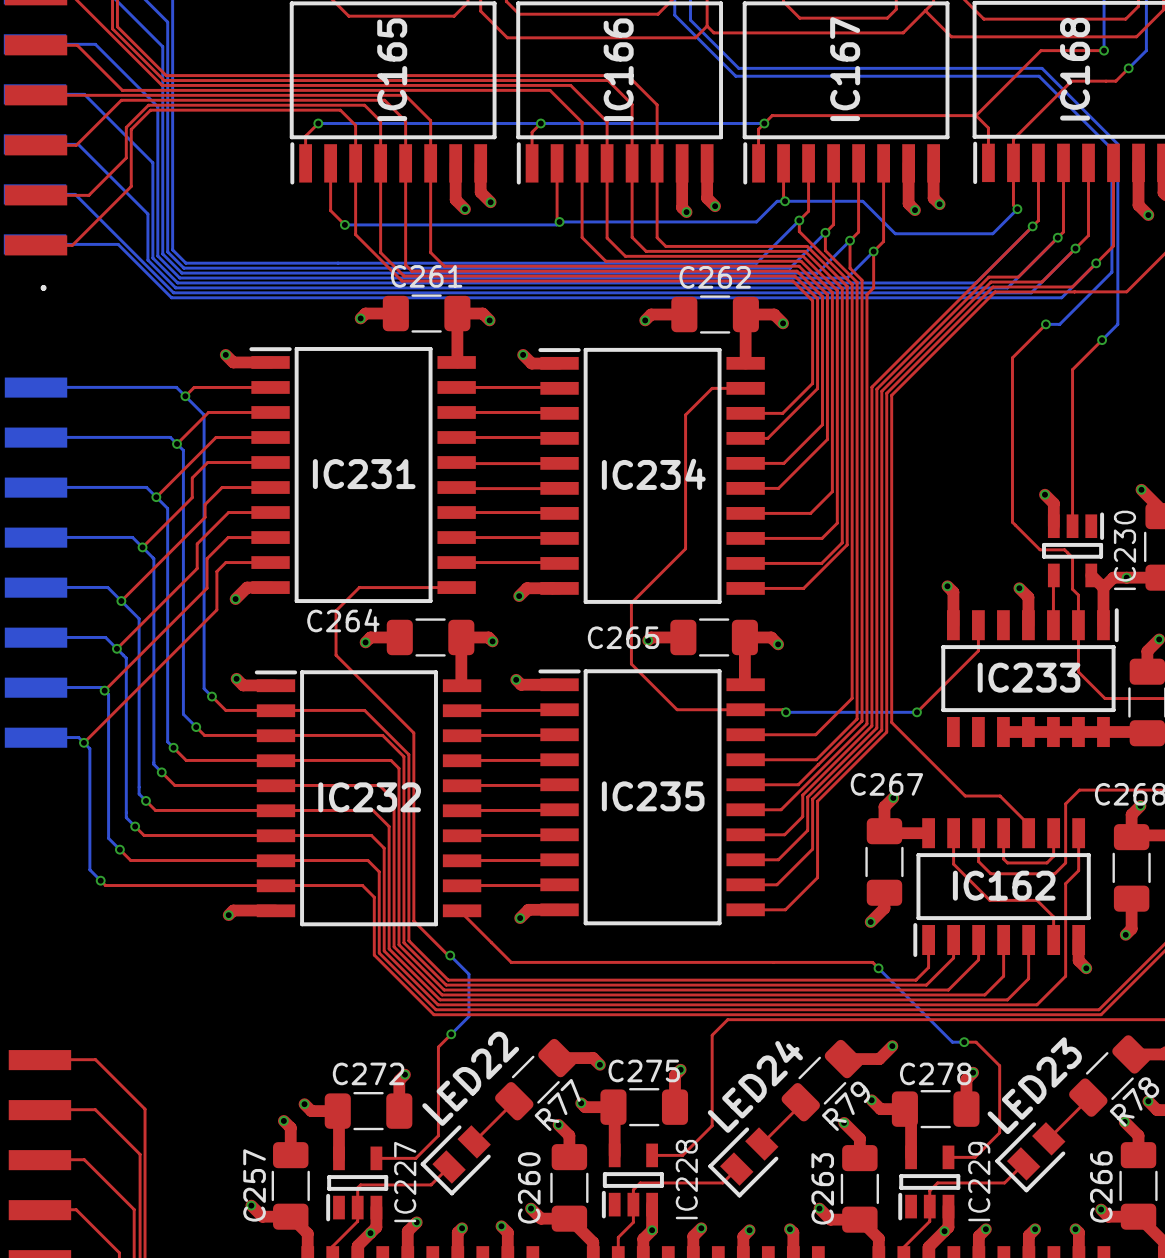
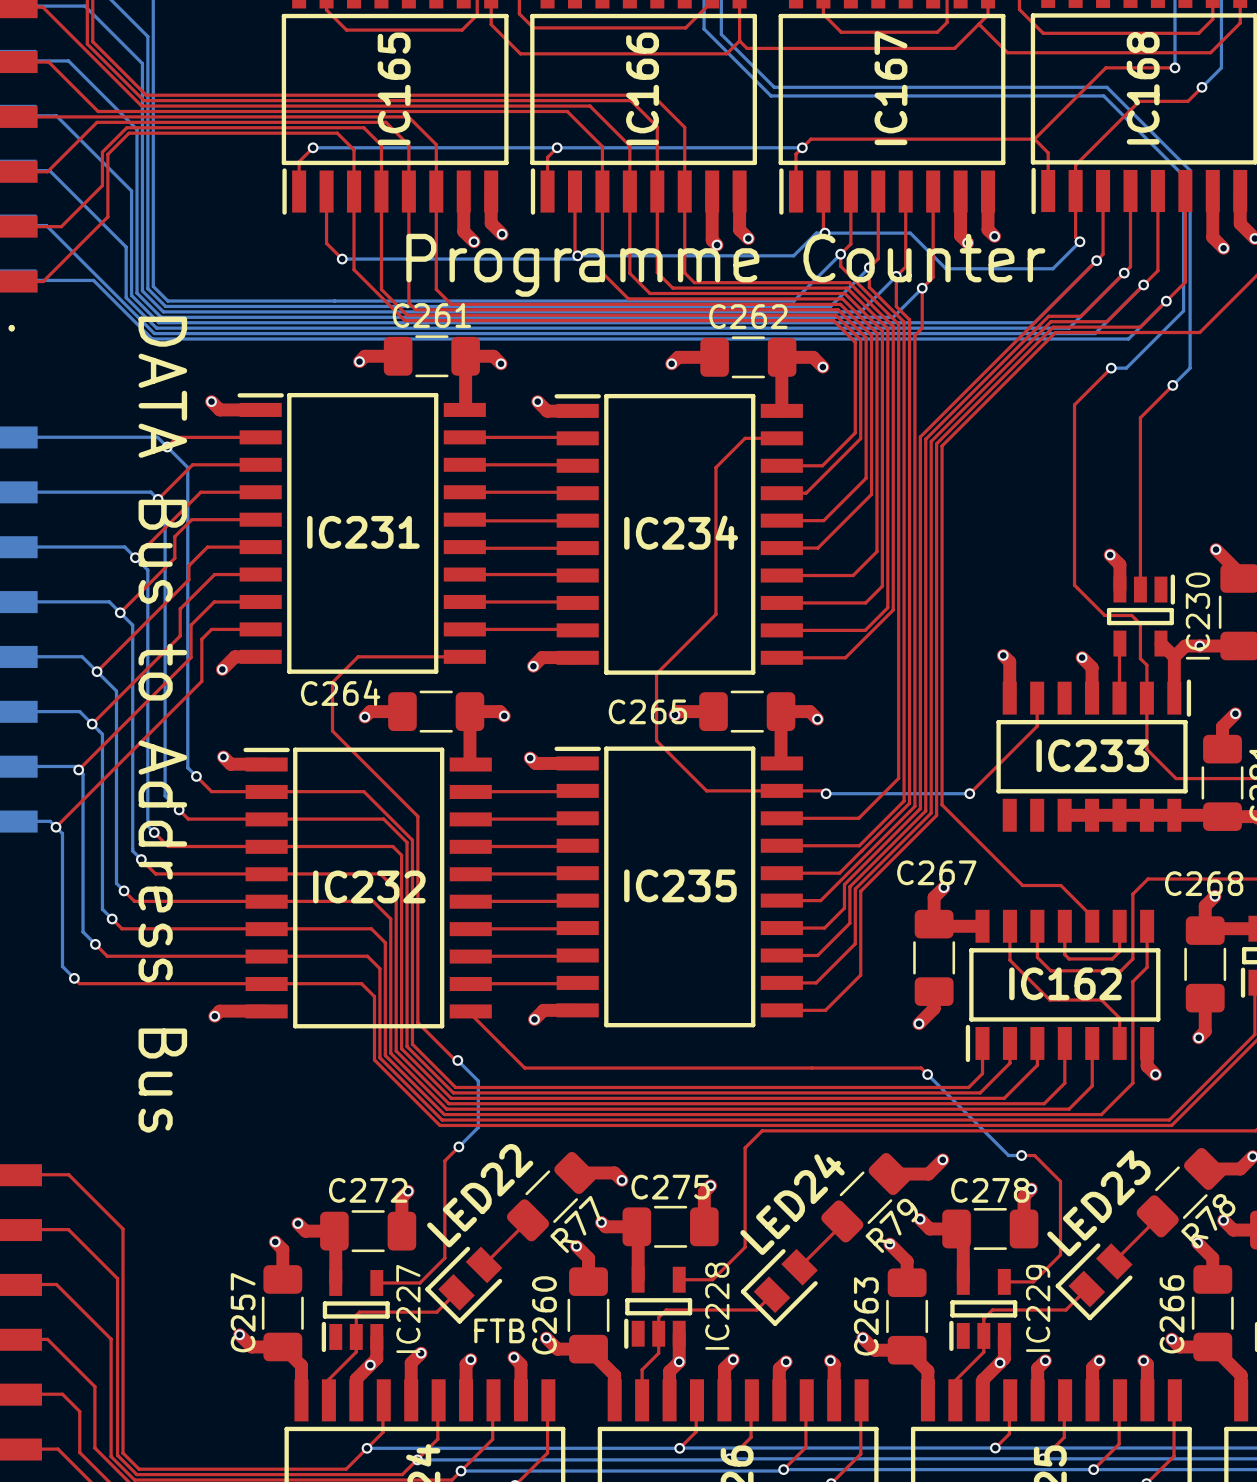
text: none -> Programme Counter (725, 265)
text: none -> DATA Bus to Address Bus (162, 724)
text: none -> FTB (499, 1330)

